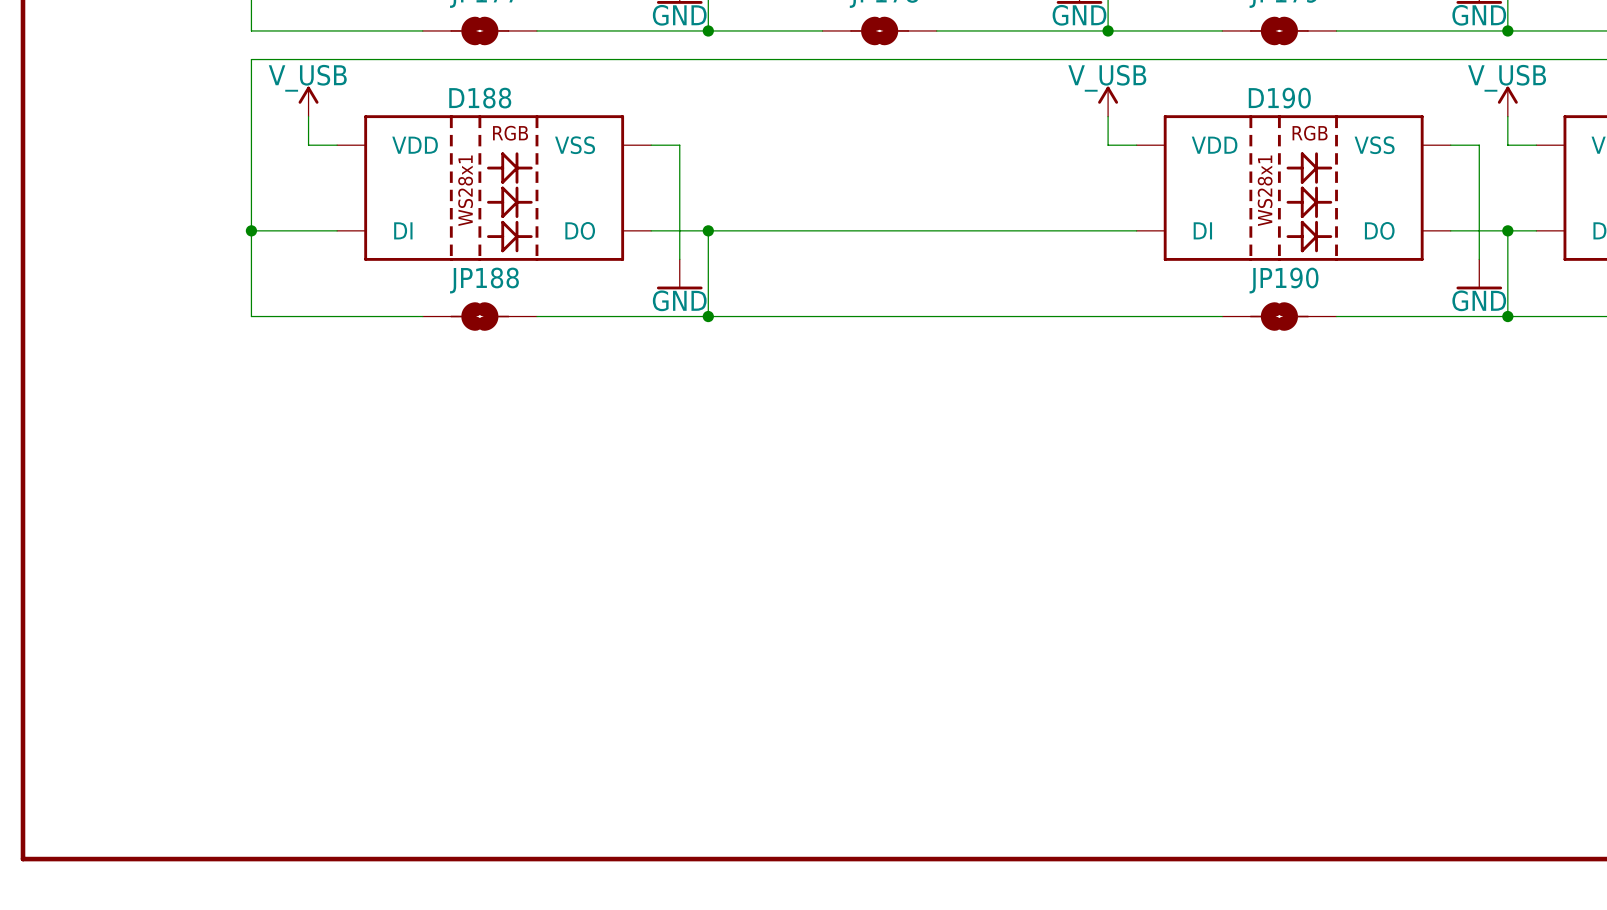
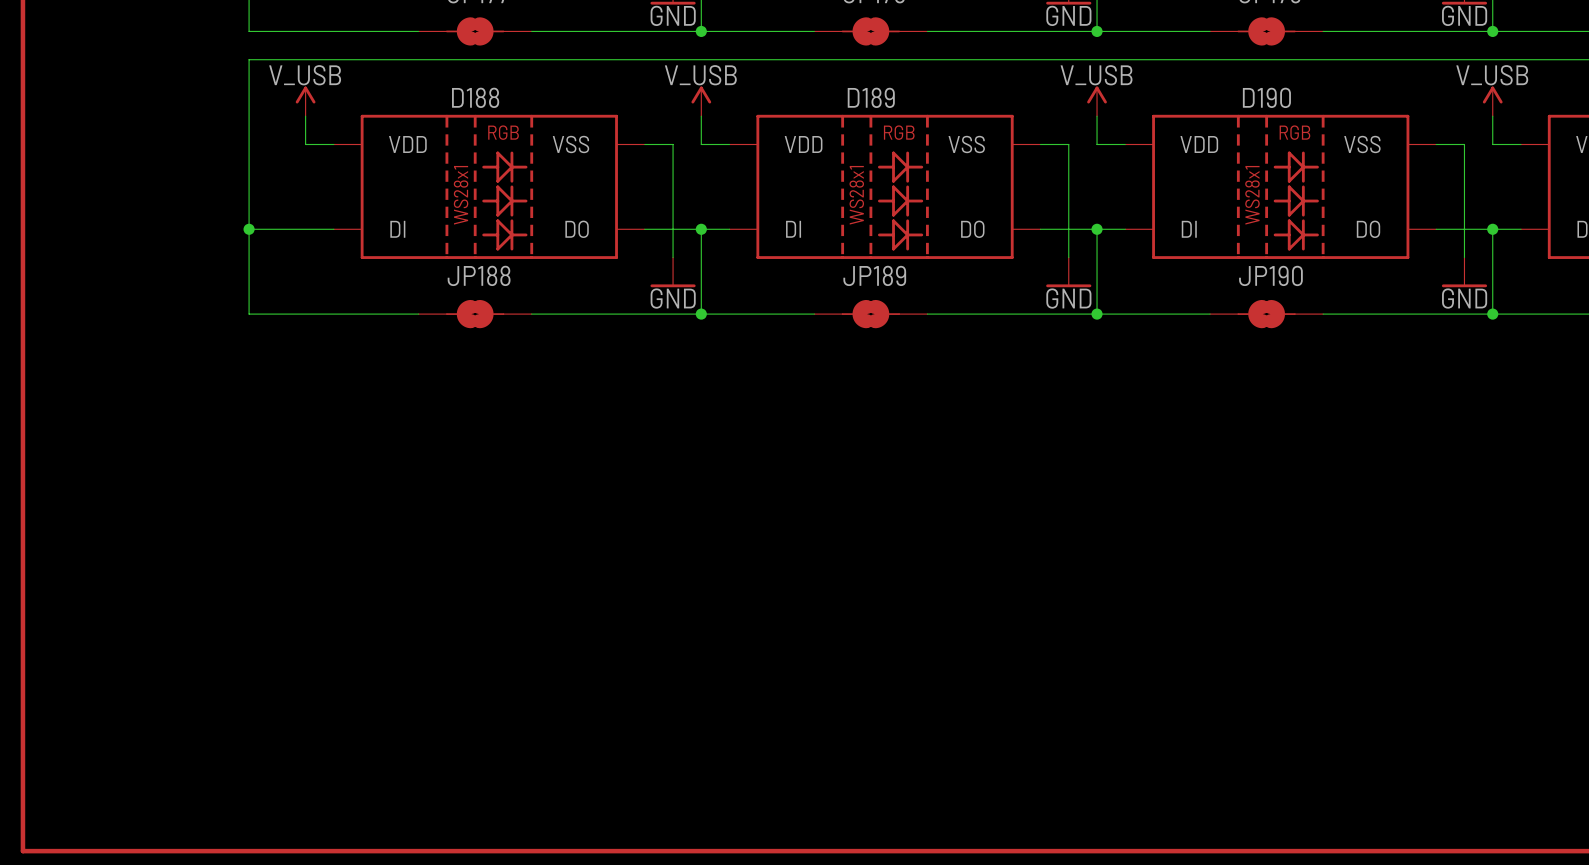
power symbol: none -> V_USB (701, 101)
wire: none -> (701, 116) (701, 144) (729, 144)
wire: none -> (1040, 144) (1068, 144) (1068, 257)
D189: none -> (885, 186)
wire: (736, 230) (1050, 230) -> none
wire: none -> (1097, 229) (1097, 314)
junction: none -> (1097, 229)
power symbol: none -> GND (1068, 272)
JP189: none -> (870, 314)
junction: none -> (1097, 314)

